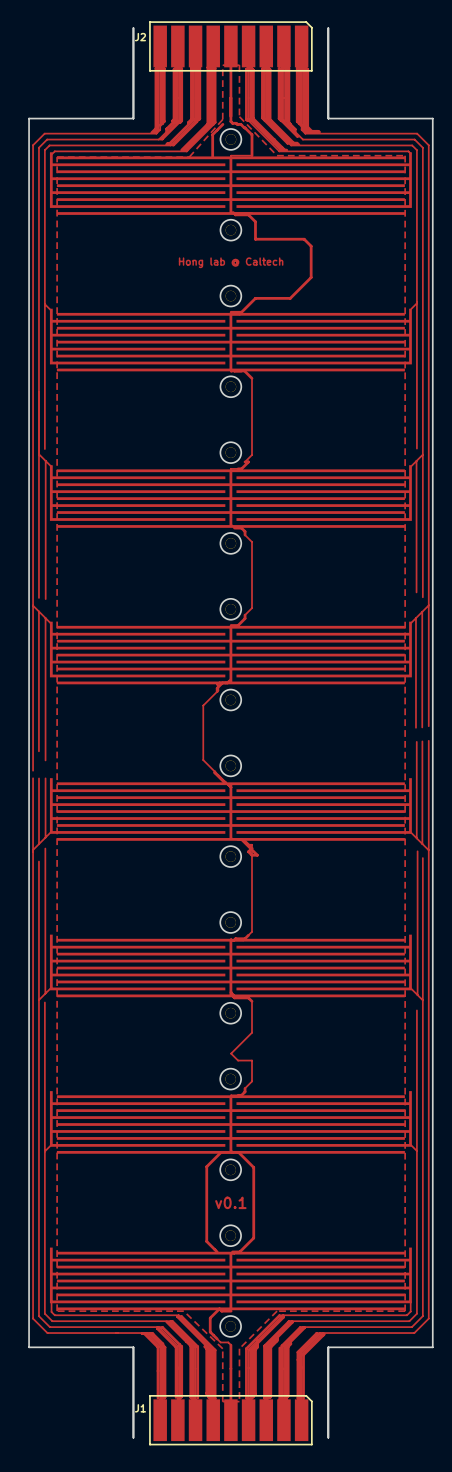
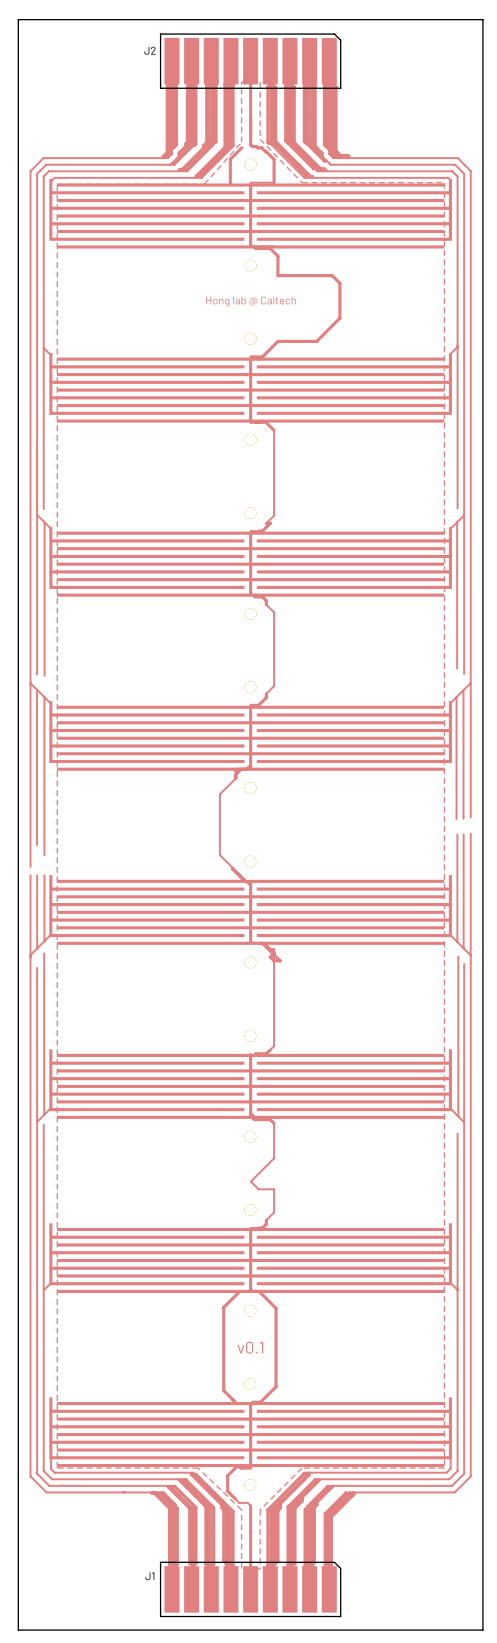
board edge: none -> (18, 19) (18, 1630) (482, 1630) (482, 19) (18, 19)
board edge: (133, 28) (133, 118) (29, 118) (29, 1347) (133, 1347) (133, 1437) -> none
board edge: (328, 28) (328, 118) (432, 118) (432, 1347) (328, 1347) (328, 1437) -> none
round board edge: [220, 128, 242, 150] -> none
round board edge: [220, 219, 242, 241] -> none
round board edge: [220, 285, 242, 307] -> none
round board edge: [220, 376, 242, 398] -> none
round board edge: [220, 442, 242, 464] -> none
round board edge: [220, 532, 242, 554] -> none
round board edge: [220, 598, 242, 620] -> none
round board edge: [220, 689, 242, 711] -> none
round board edge: [220, 755, 242, 777] -> none
round board edge: [220, 846, 242, 868] -> none
round board edge: [220, 912, 242, 933] -> none
round board edge: [220, 1002, 242, 1024] -> none
round board edge: [220, 1068, 242, 1090] -> none
round board edge: [220, 1159, 242, 1181] -> none
round board edge: [220, 1225, 242, 1247] -> none
round board edge: [220, 1316, 242, 1337] -> none

